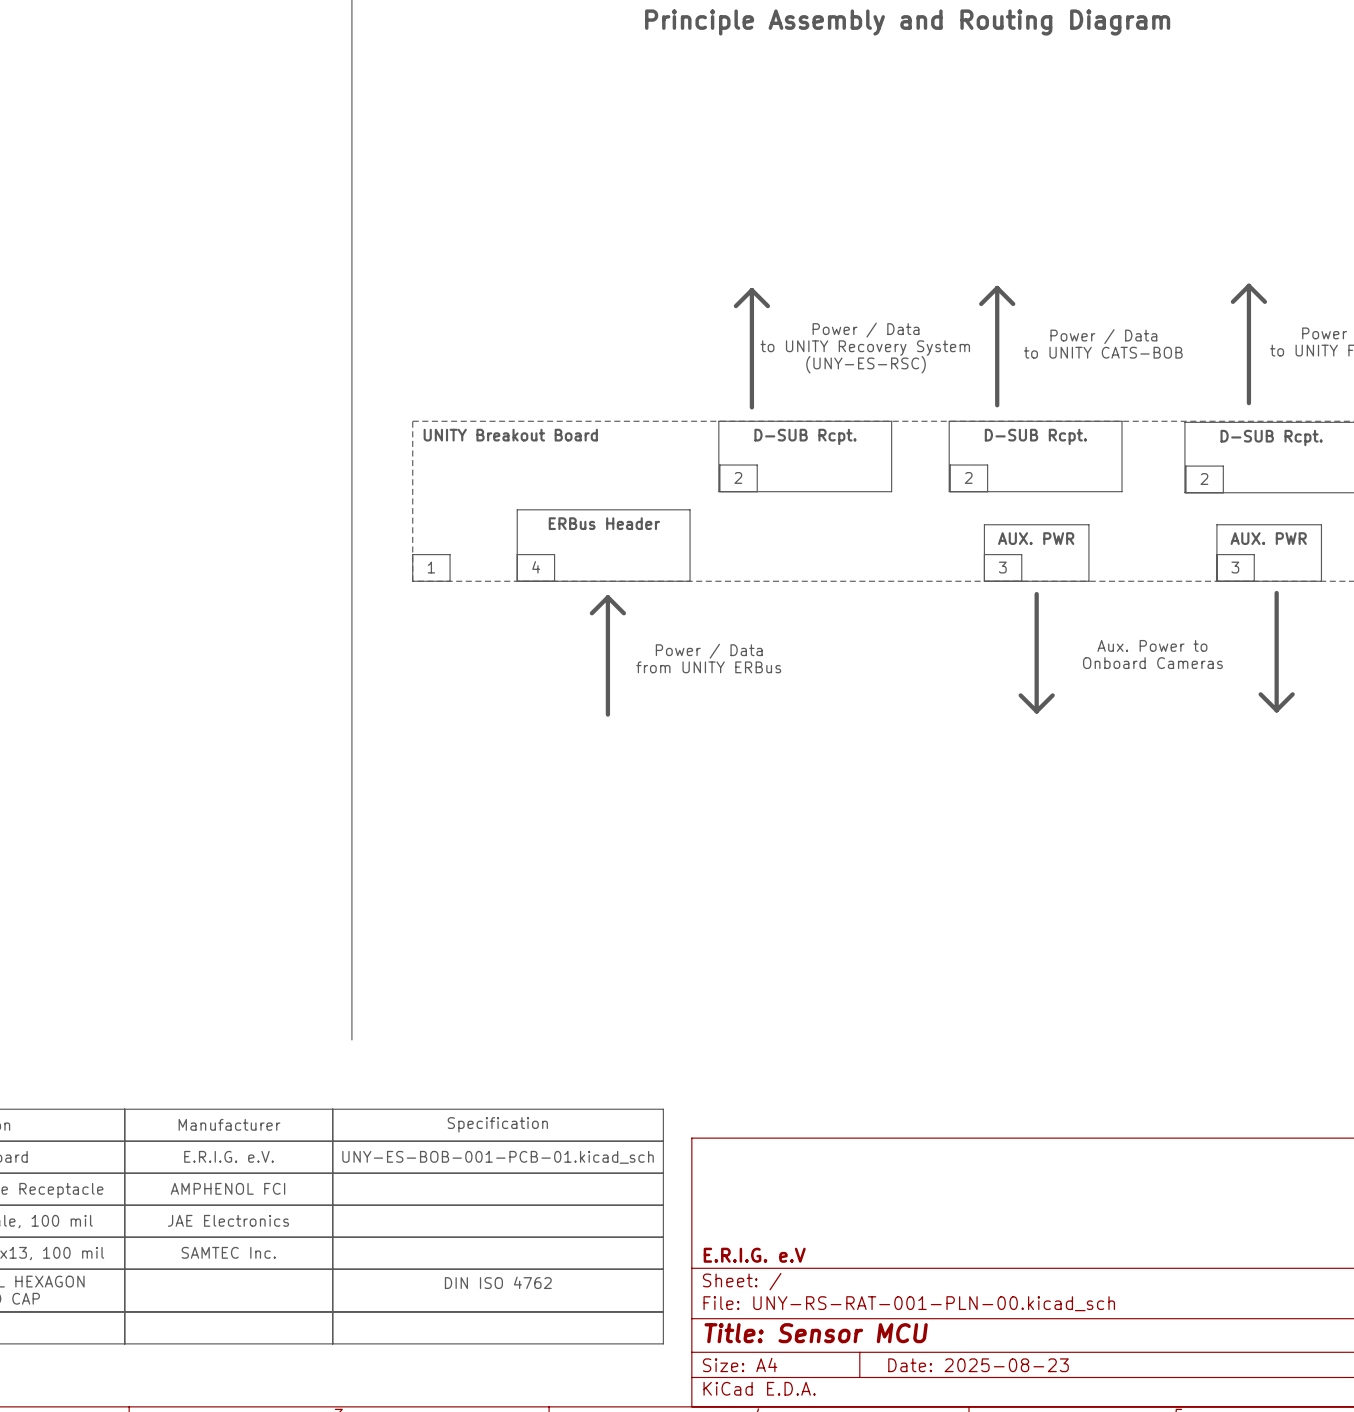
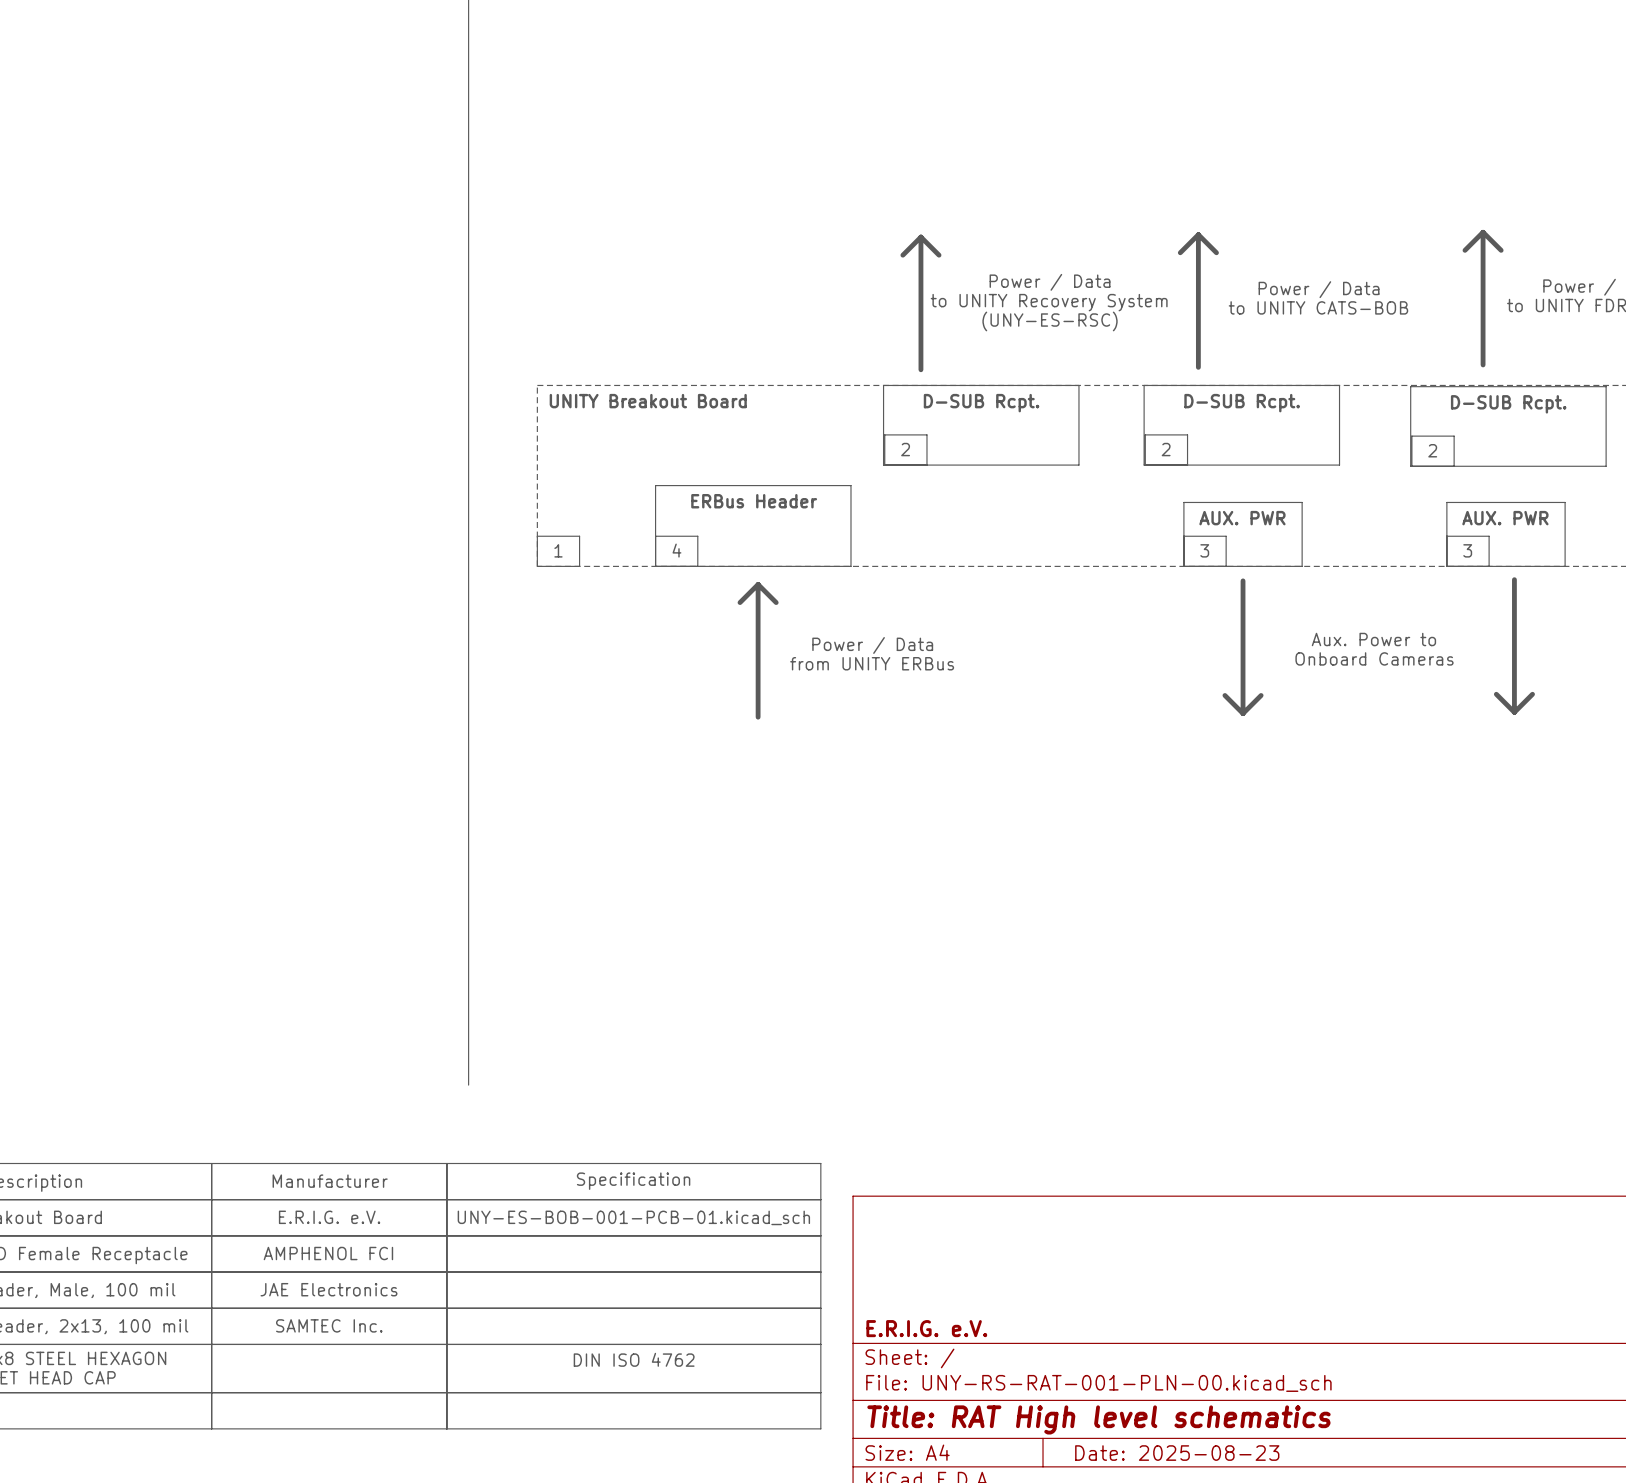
title block: E.R.I.G. e.V (754, 1255) -> E.R.I.G. e.V. (926, 1328)
title block: Title: Sensor MCU (816, 1333) -> Title: RAT High level schematics (1098, 1419)

